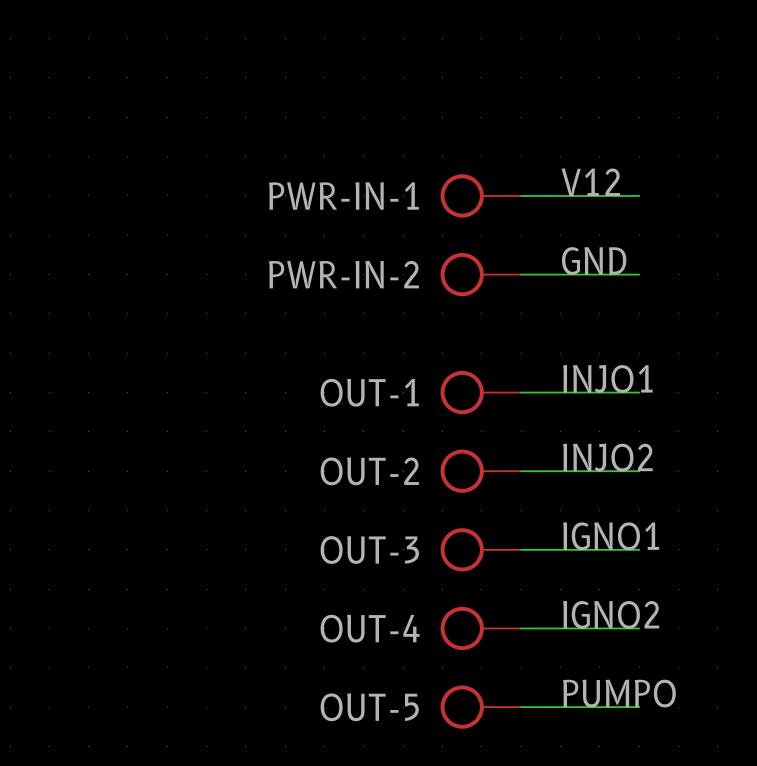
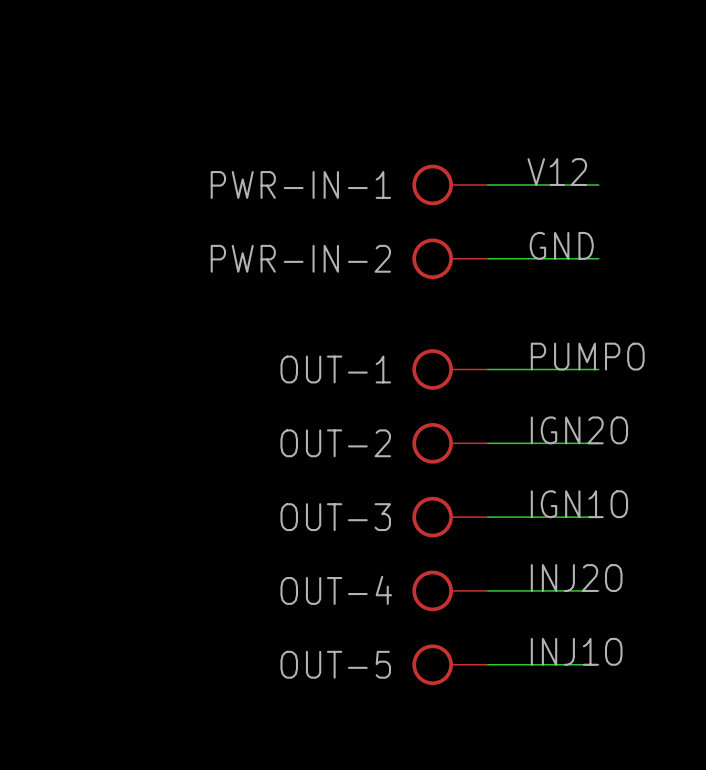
label: INJO1 (607, 378) -> PUMPO (587, 356)
label: INJO2 (607, 457) -> IGN2O (579, 430)
label: IGNO1 (611, 536) -> IGN1O (579, 504)
label: IGNO2 (611, 614) -> INJ2O (576, 578)
label: PUMPO (619, 693) -> INJ1O (576, 651)

